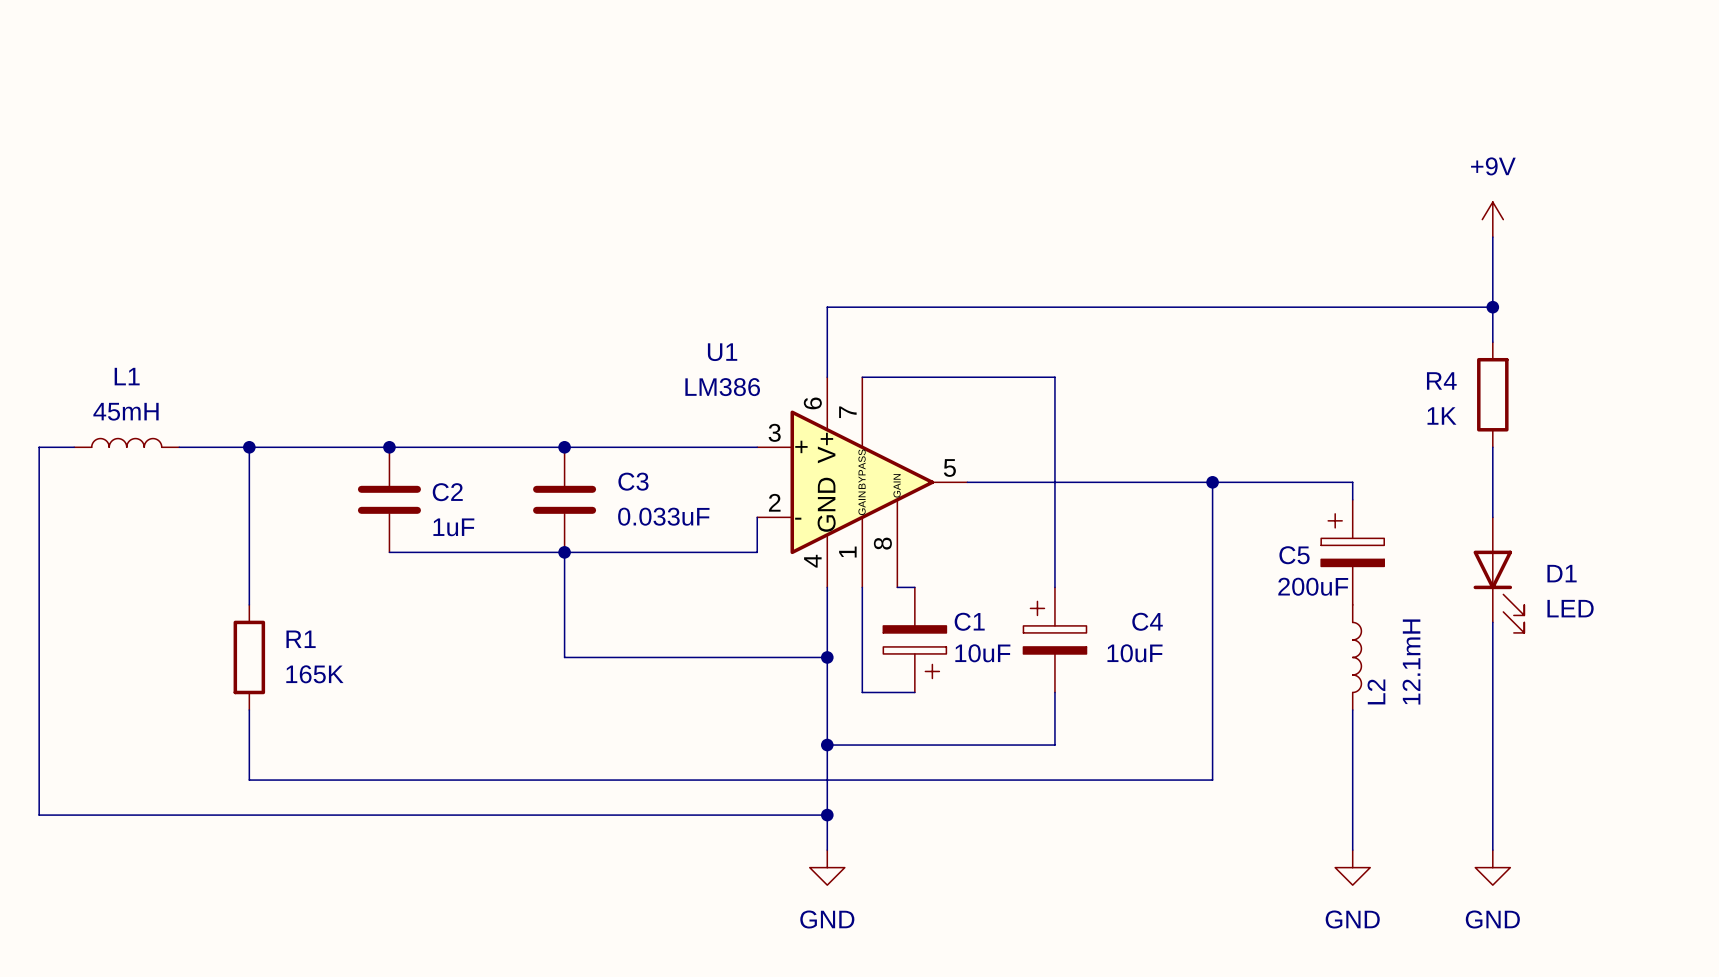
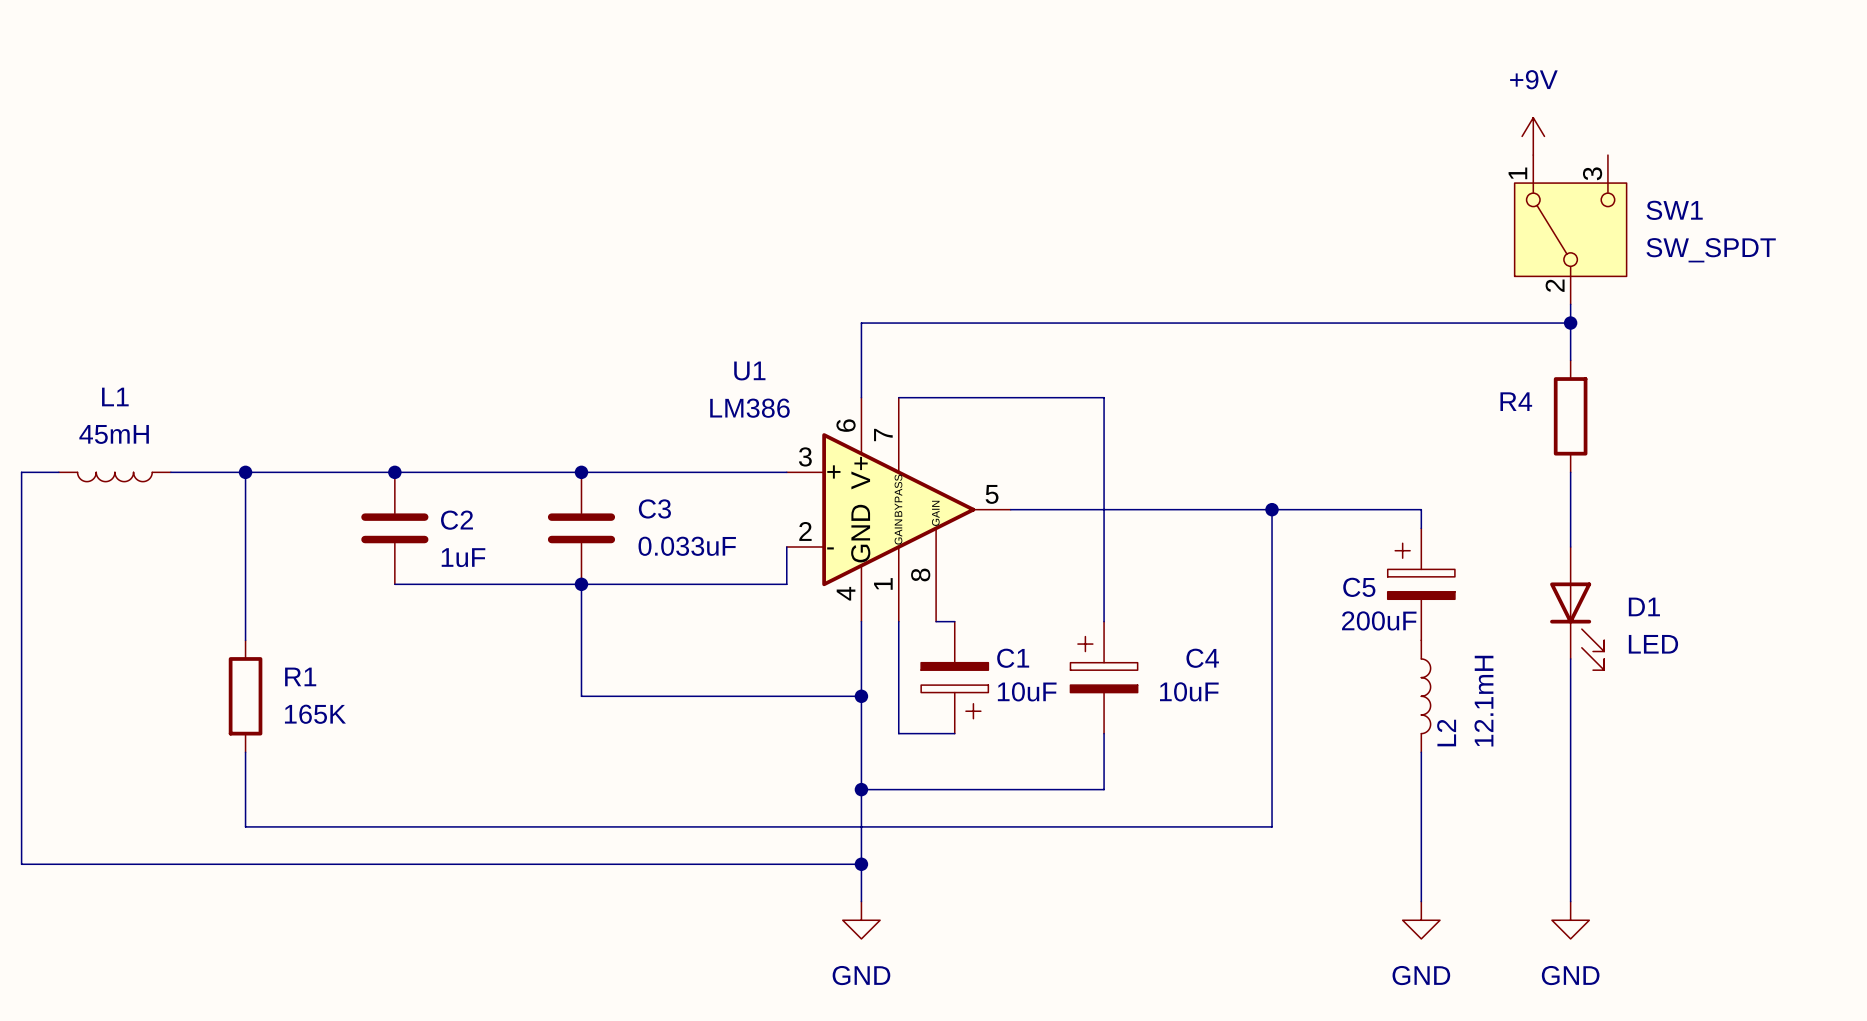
SW1: none -> SW_SPDT (1570, 229)
power symbol position: +9V (1492, 219) -> +9V (1533, 136)
R4 value: 1K (1441, 415) -> none
L1 rotation: 0° (126, 442) -> 180° (114, 476)

